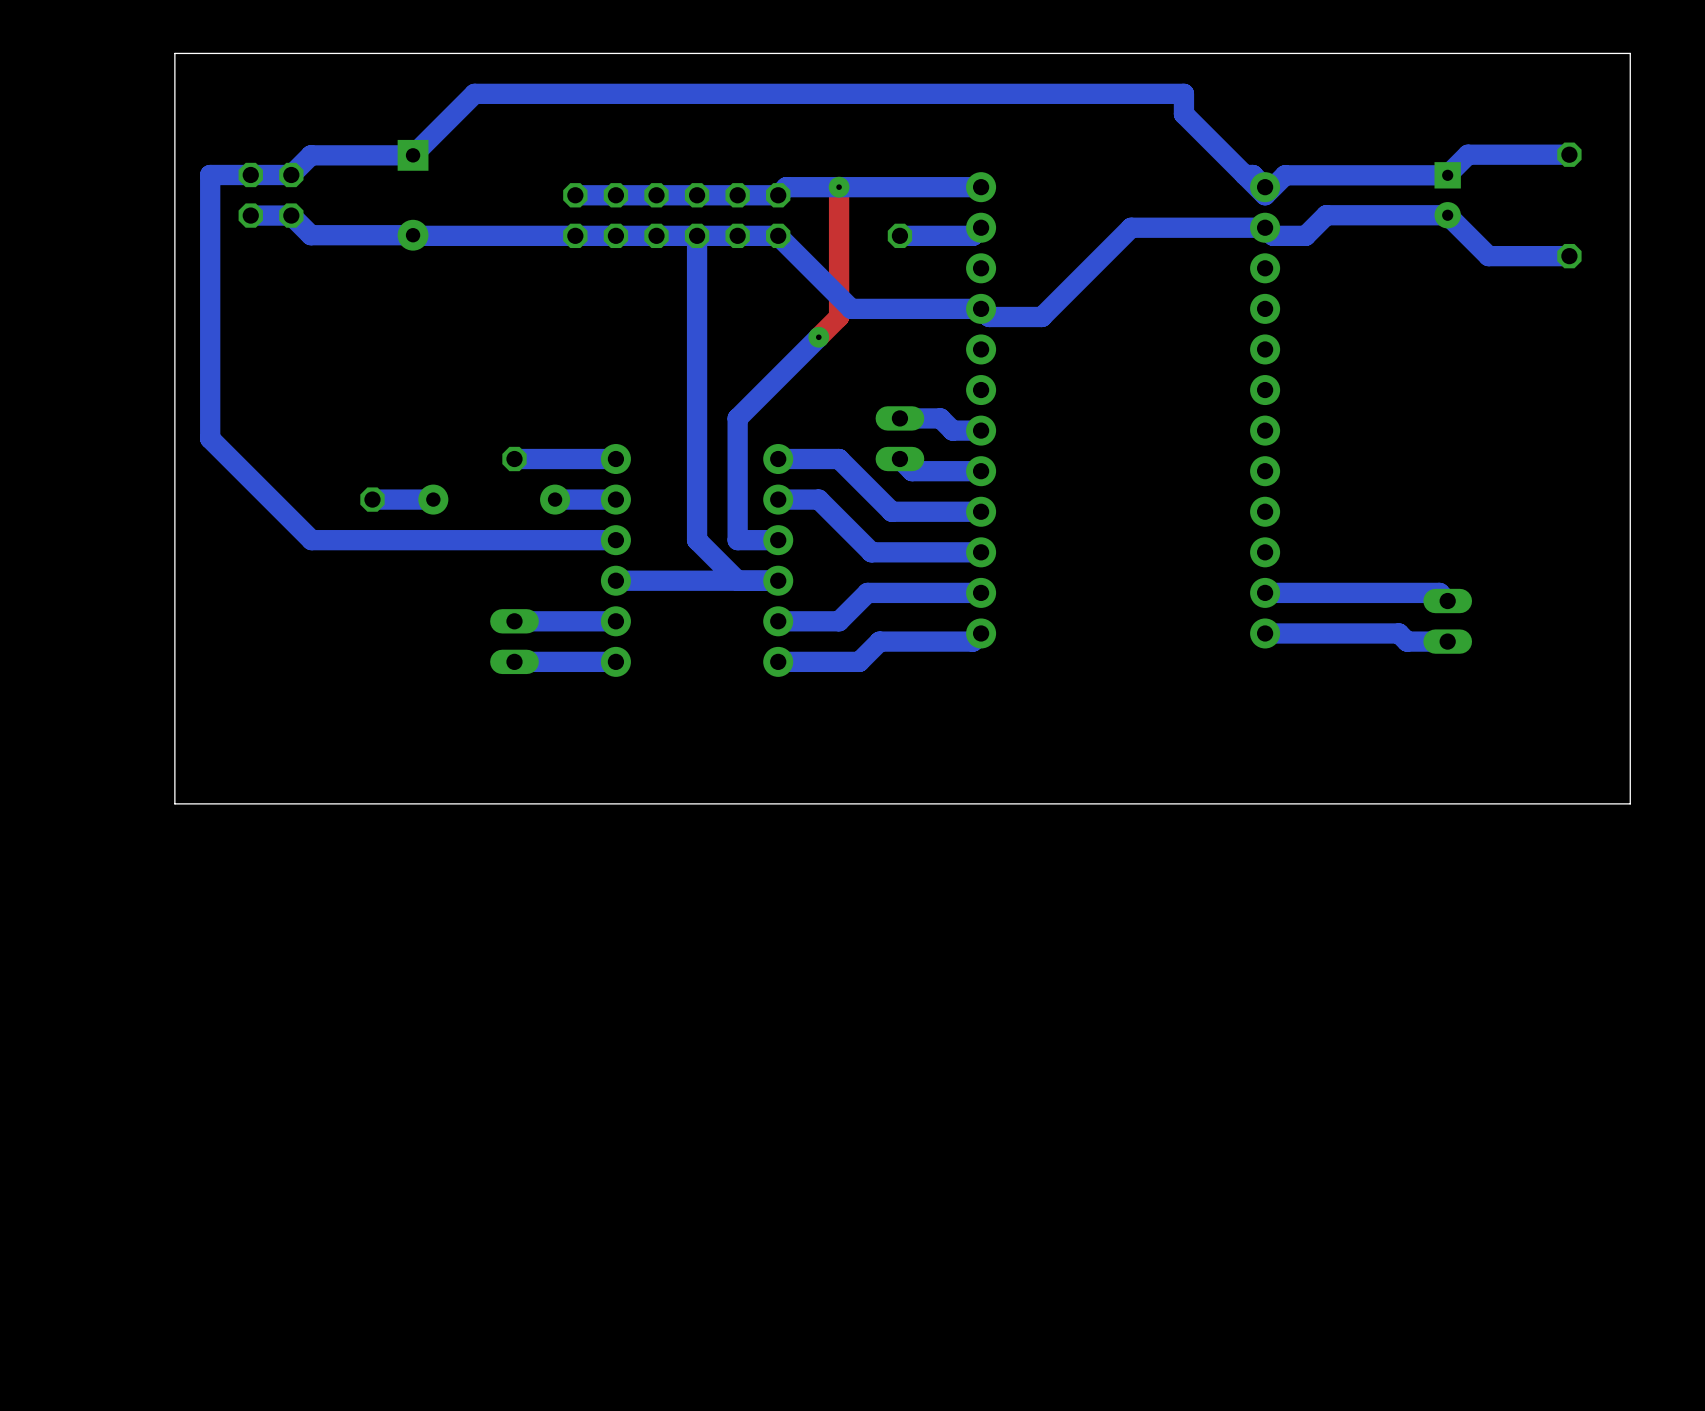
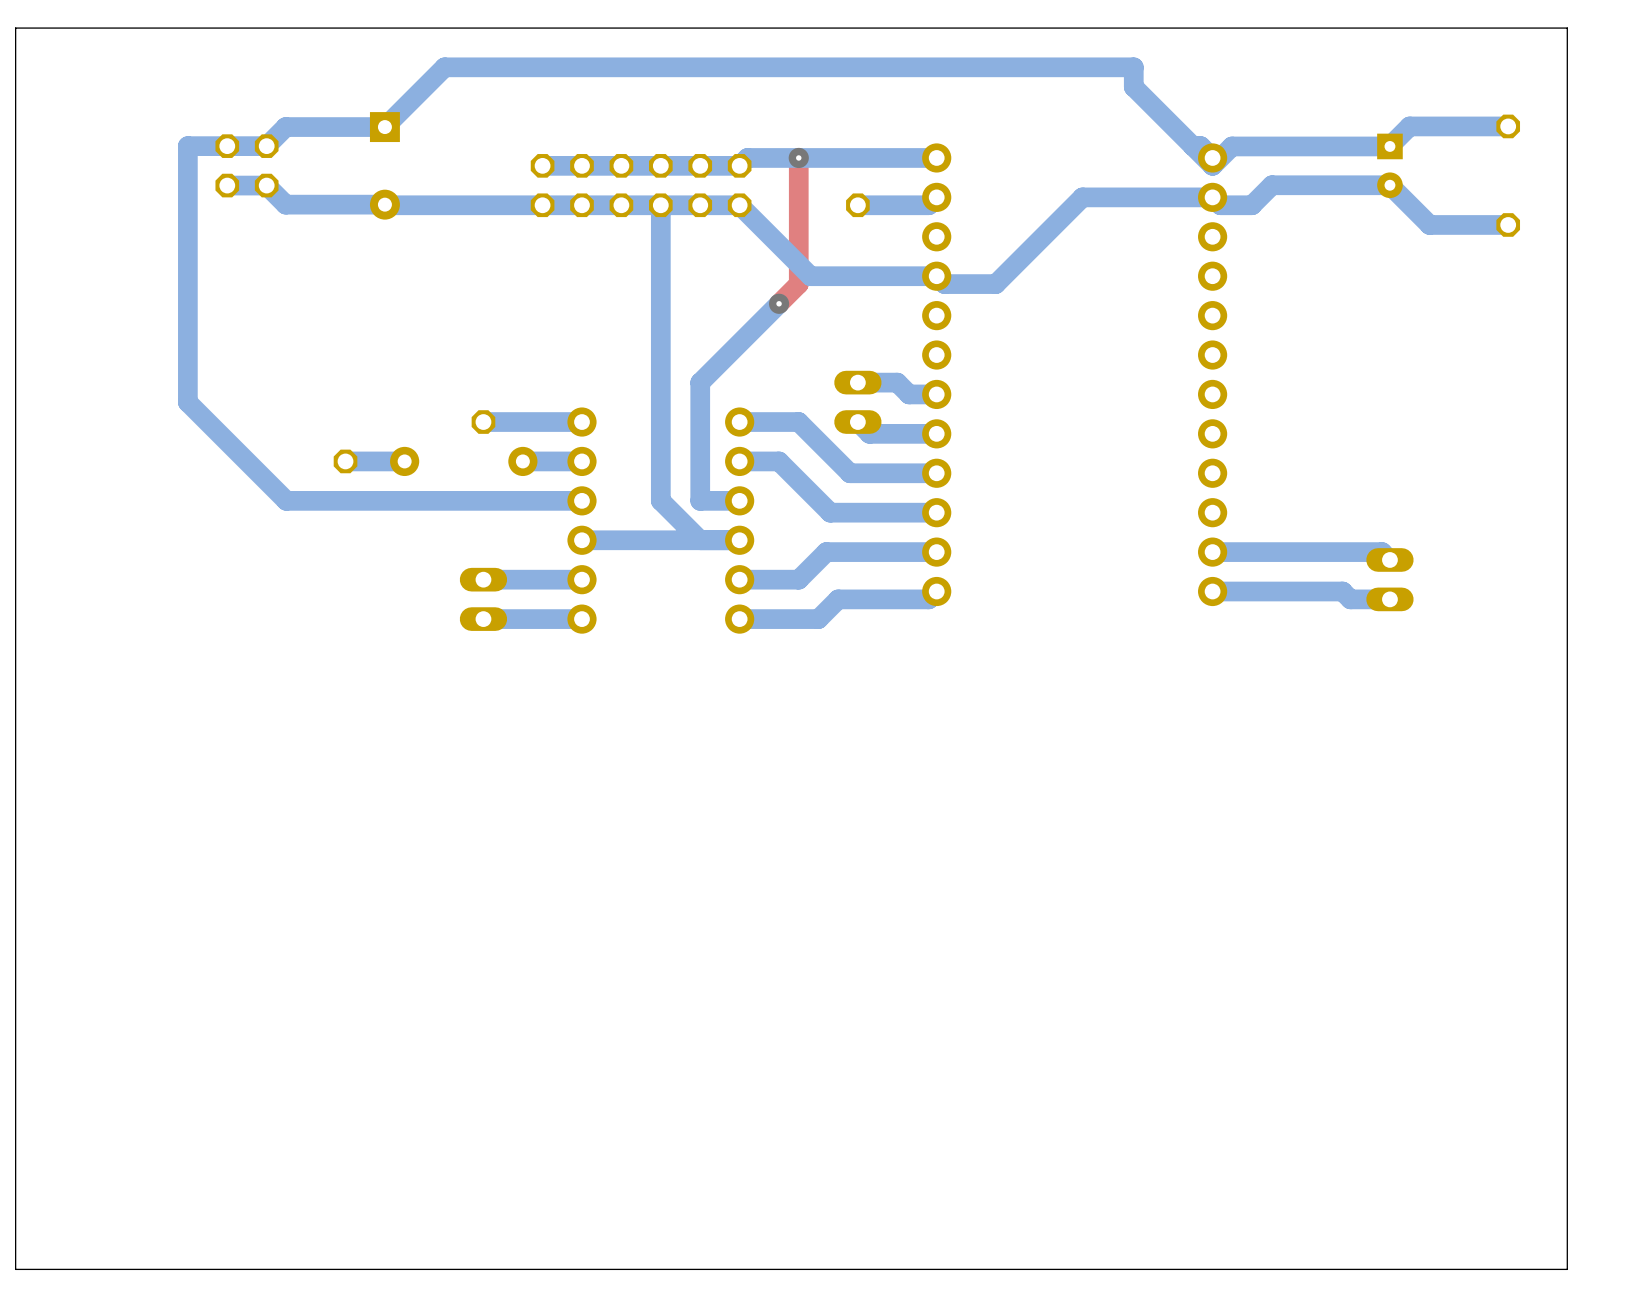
board edge: (174, 53) (174, 803) (1630, 803) -> (153, 28) (15, 28) (15, 1269) (1567, 1269) (1567, 757)

